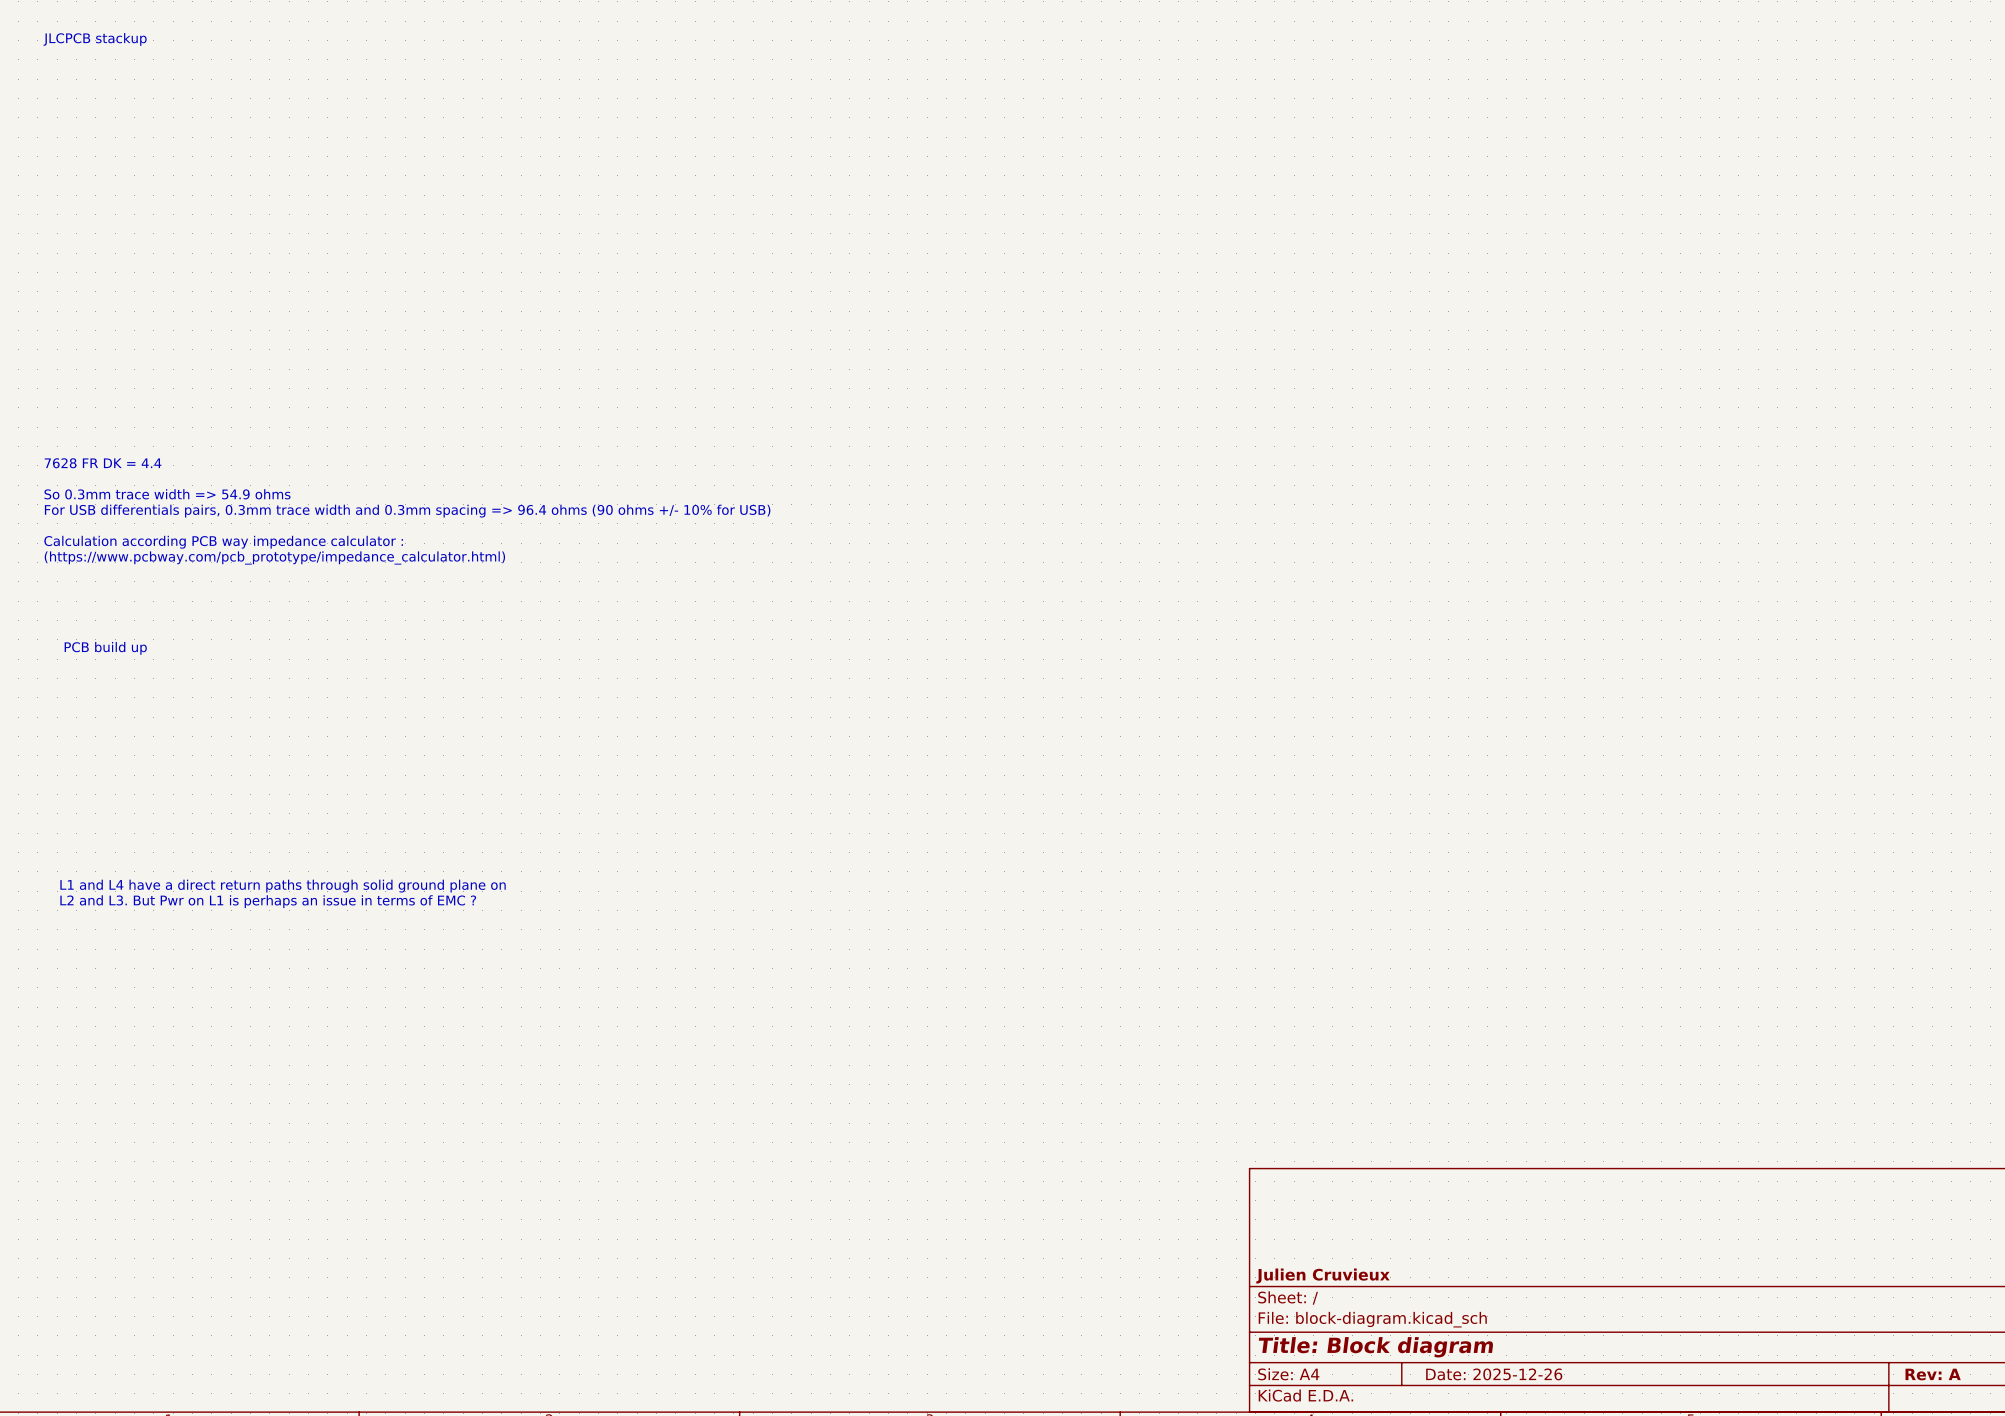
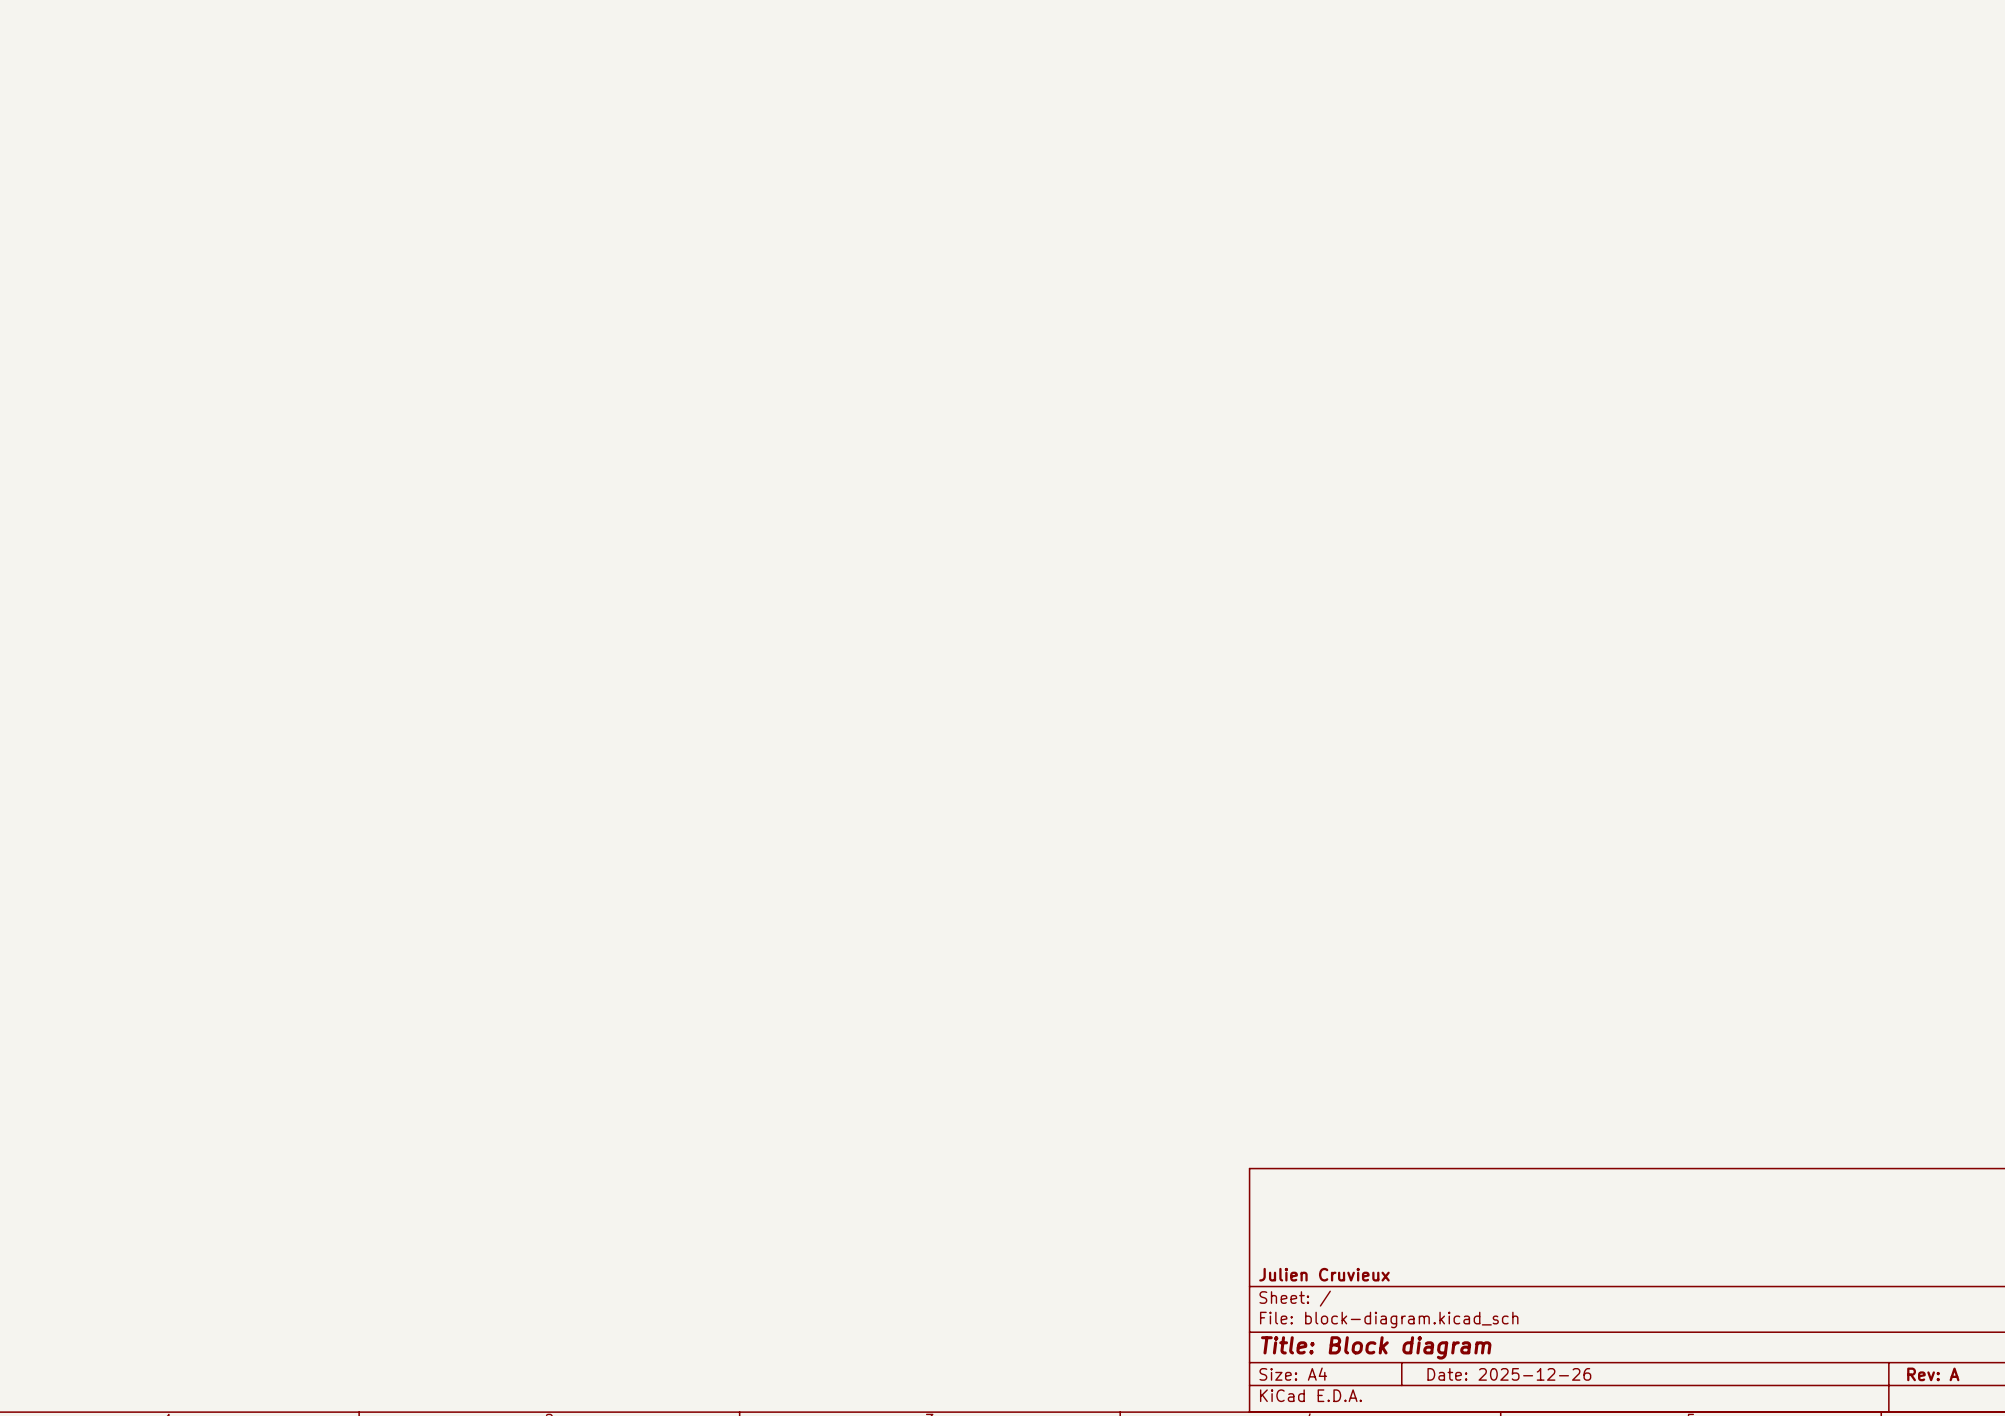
text: JLCPCB stackup (95, 39) -> none
text: 7628 FR DK = 4.4 (103, 463) -> none
text: So 0.3mm trace width => 54.9 ohms (167, 494) -> none
text: For USB differentials pairs, 0.3mm trace width and 0.3mm spacing => 96.4 ohms (90 ohms +/- 10% for USB) (407, 511) -> none
text: Calculation according PCB way impedance calculator : (223, 542) -> none
text: (https://www.pcbway.com/pcb_prototype/impedance_calculator.html) (274, 557) -> none
text: PCB build up (105, 648) -> none
text: L1 and L4 have a direct return paths through solid ground plane on (283, 886) -> none
text: L2 and L3. But Pwr on L1 is perhaps an issue in terms of EMC ? (268, 901) -> none

